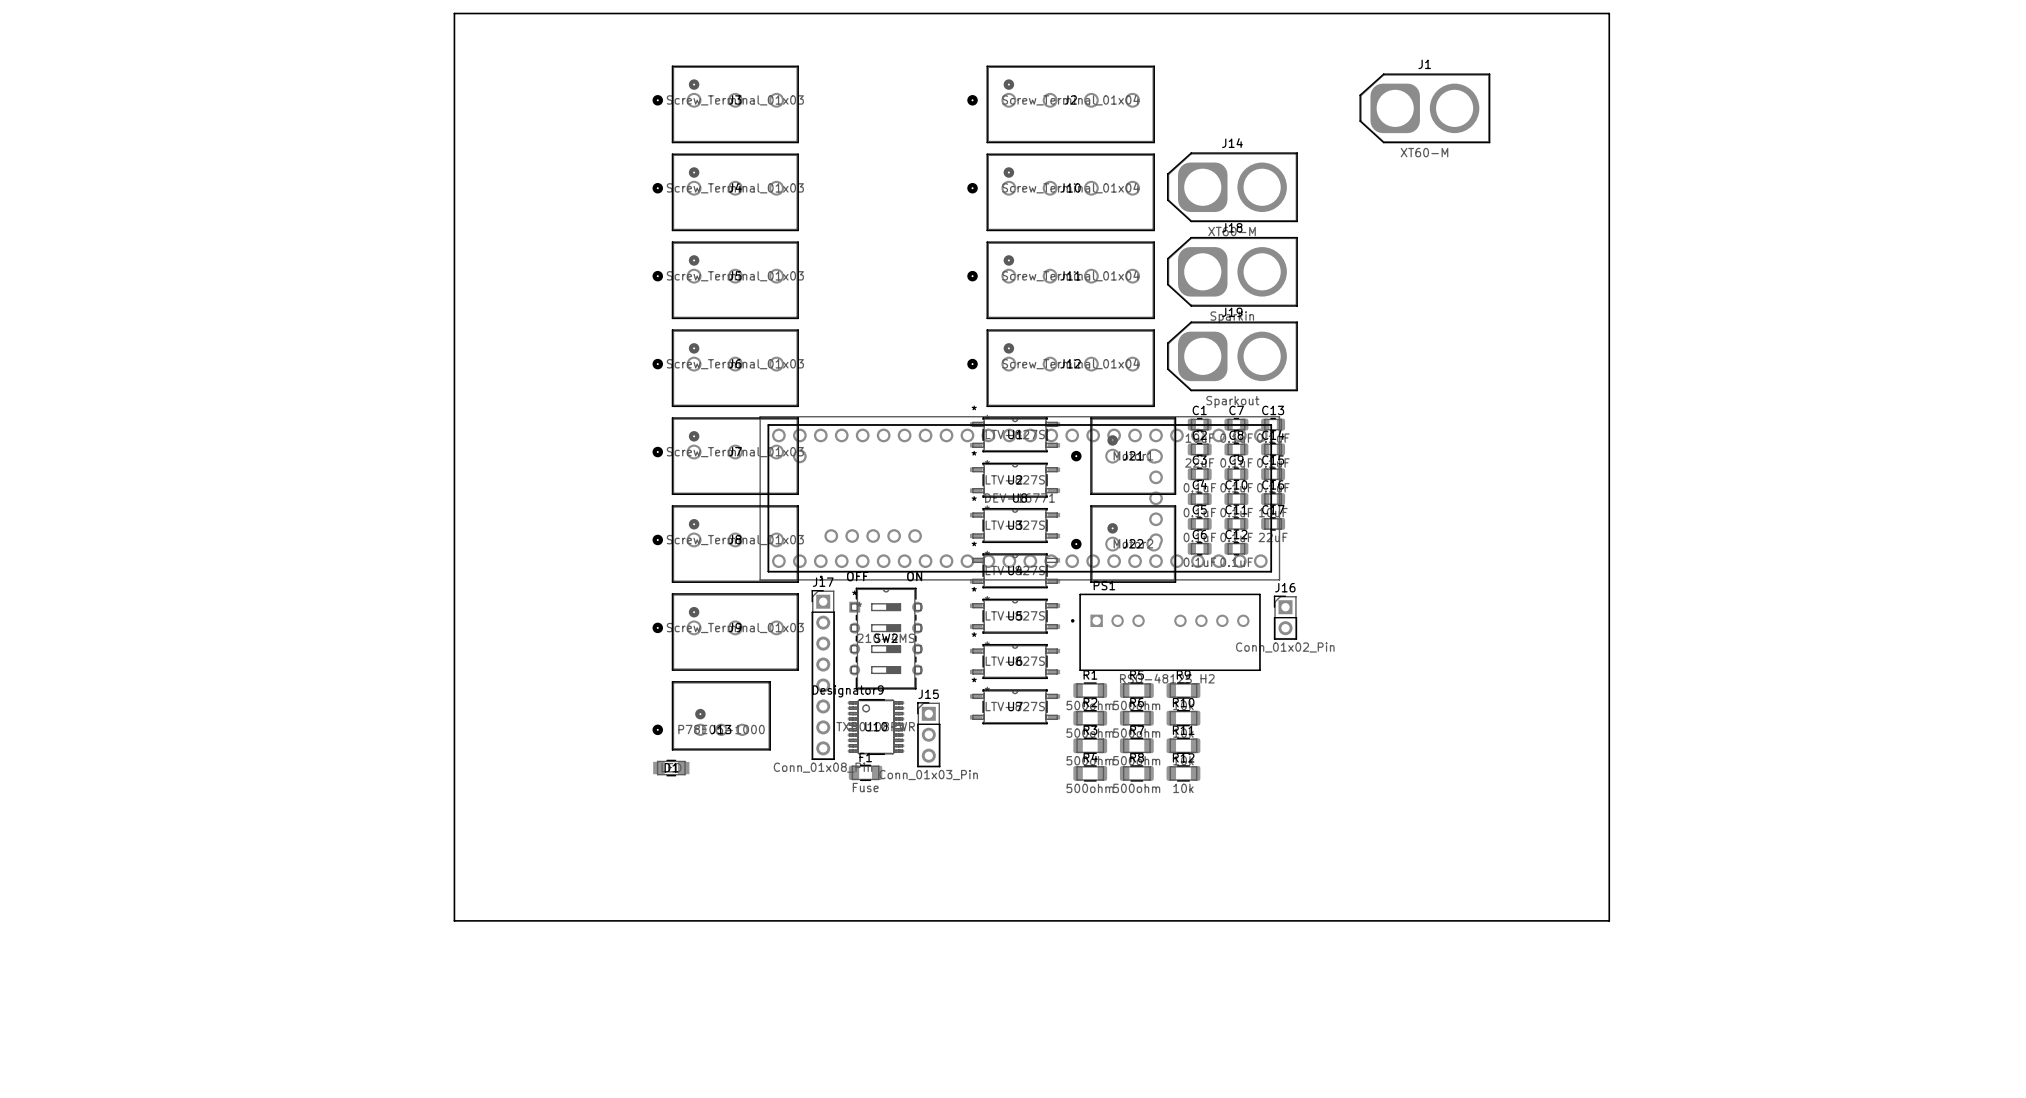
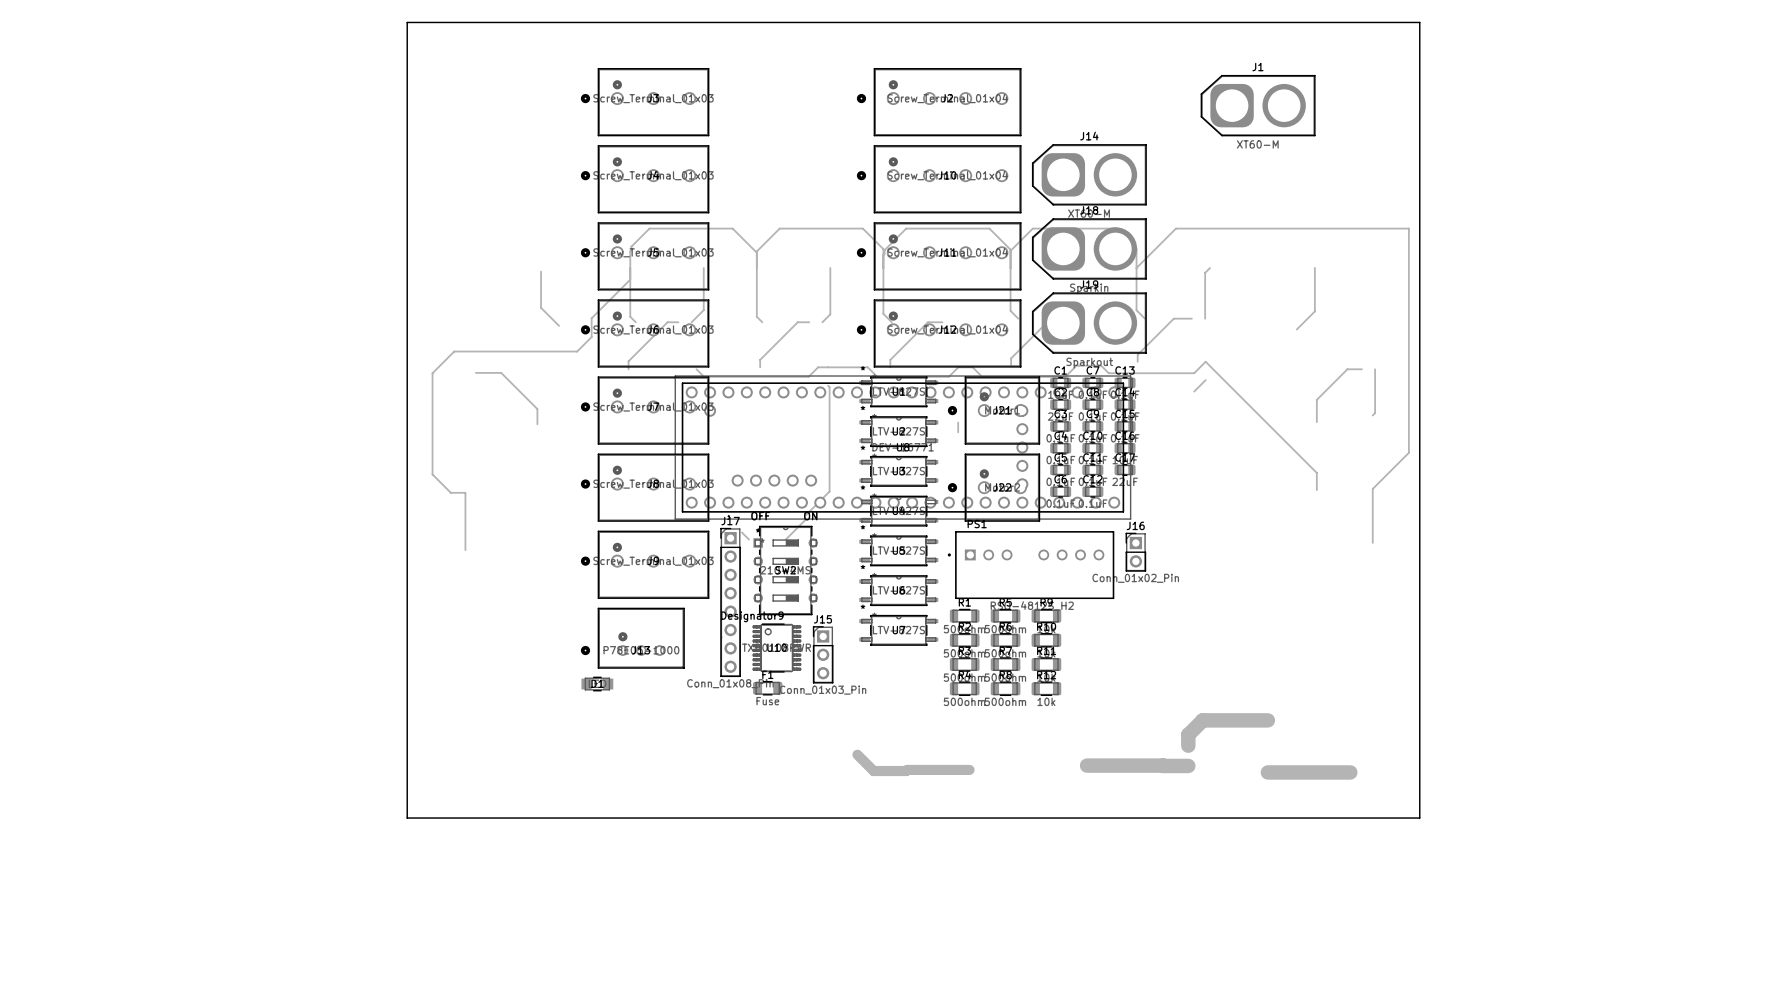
track: none -> (1010, 250) (1032, 228) (1115, 228) (1136, 249) (1136, 310) (1144, 318)
track: none -> (756, 252) (732, 228) (649, 228) (631, 246) (630, 251) (630, 316) (635, 322)
track: none -> (883, 255) (884, 250) (906, 228) (989, 228) (1010, 249) (1010, 310) (1018, 318)
track: none -> (703, 268) (703, 310) (691, 322)
track: none -> (830, 268) (830, 314) (822, 322)
track: none -> (1136, 268) (1175, 228) (1408, 228) (1408, 452) (1372, 488) (1372, 542)
track: none -> (1210, 268) (1205, 272) (1205, 318)
track: none -> (1314, 268) (1314, 311) (1296, 329)
track: none -> (541, 271) (541, 307) (559, 325)
track: none -> (630, 279) (591, 318) (591, 337) (577, 351) (454, 351) (432, 373) (432, 474) (450, 492) (465, 493) (465, 550)
track: none -> (1066, 318) (1050, 318) (1011, 358) (1011, 365)
track: none -> (1191, 318) (1173, 318) (1137, 354) (1137, 361)
track: none -> (678, 322) (667, 322) (628, 361) (628, 369)
track: none -> (762, 322) (756, 316) (756, 251) (779, 228) (862, 228) (883, 249) (883, 313) (891, 322)
track: none -> (809, 322) (797, 322) (760, 359) (760, 367)
track: none -> (942, 322) (927, 322) (890, 359) (890, 367)
track: none -> (696, 369) (704, 376) (808, 376) (818, 367) (867, 367) (877, 376) (948, 376) (958, 367) (972, 367) (982, 376) (1065, 376) (1076, 365) (1101, 365) (1108, 373) (1194, 373) (1205, 361) (1316, 472) (1316, 490)
track: none -> (1361, 369) (1347, 369) (1316, 399) (1316, 422)
track: none -> (1375, 369) (1375, 413) (1372, 415)
track: none -> (475, 372) (501, 372) (537, 409) (537, 424)
track: none -> (1205, 380) (1194, 391)
track: none -> (828, 385) (829, 491) (805, 516) (805, 520) (785, 539)
track: none -> (958, 422) (958, 432)
track: none -> (741, 532) (749, 539)
track: none -> (1267, 720) (1202, 720) (1188, 734) (1188, 745)
track: none -> (857, 754) (873, 771) (969, 769)
track: none -> (1087, 765) (1188, 765)
track: none -> (1354, 768) (1350, 772) (1267, 772)

